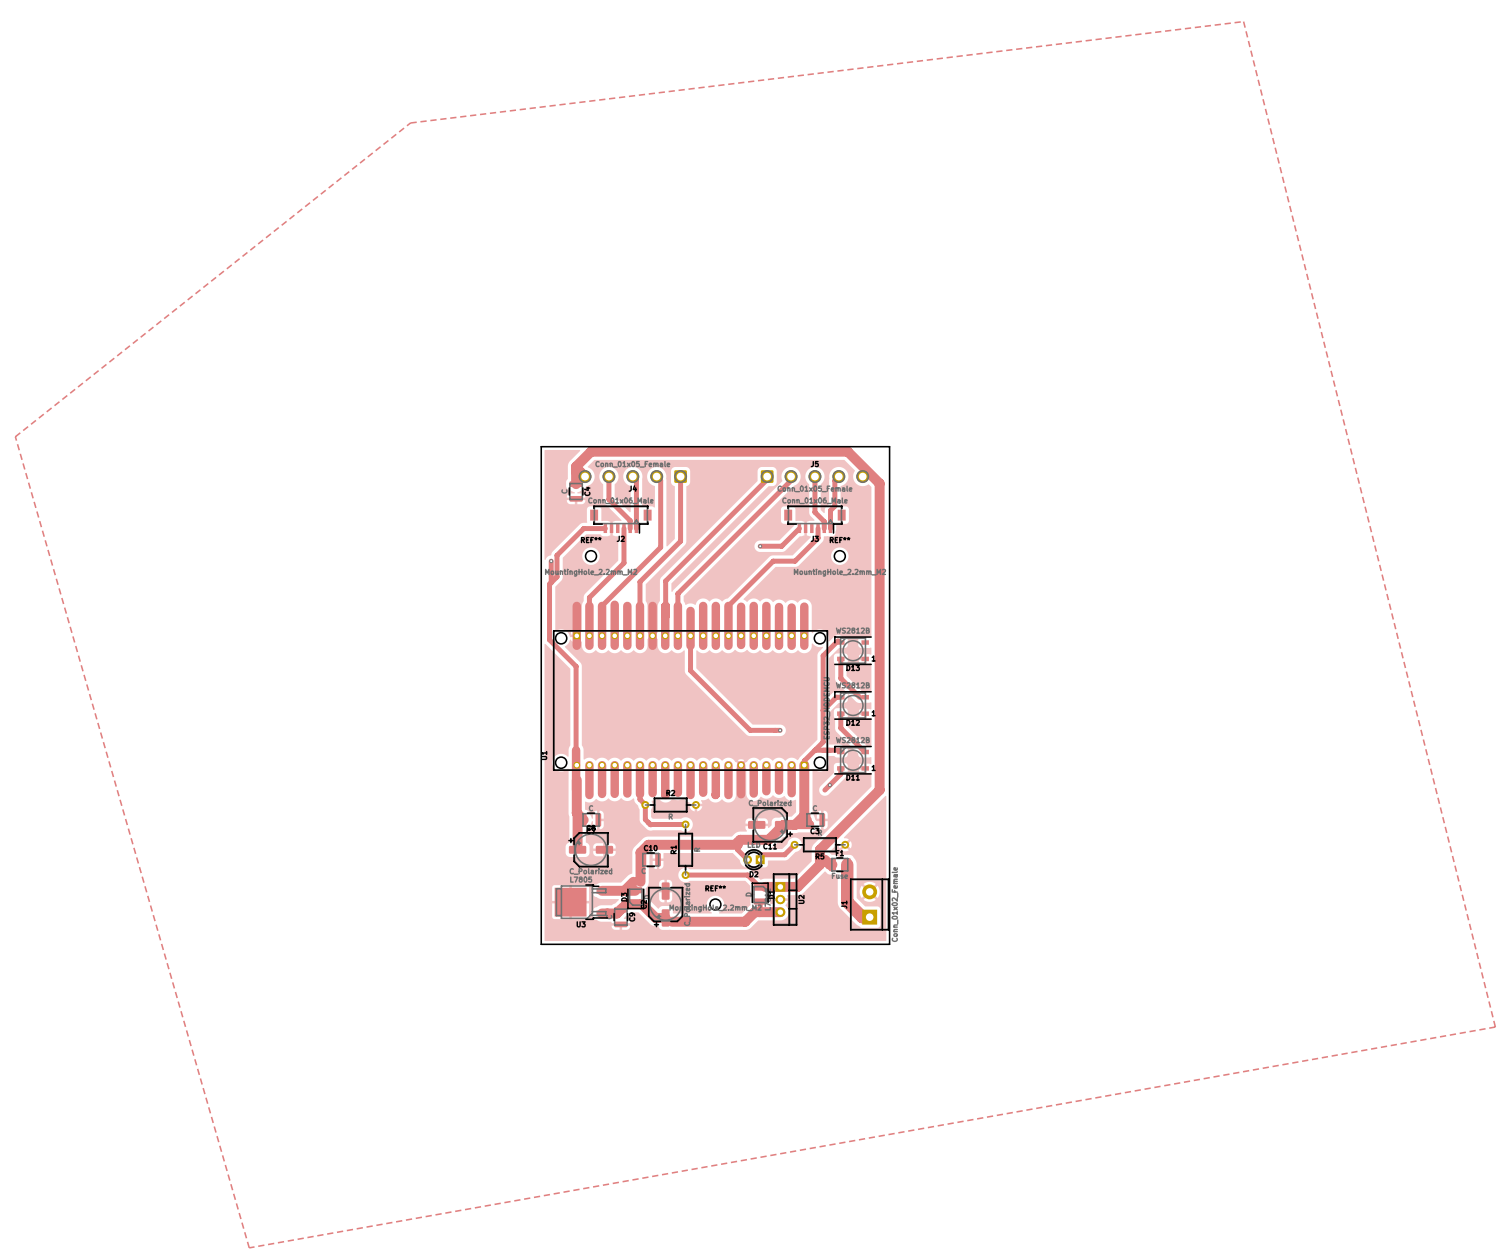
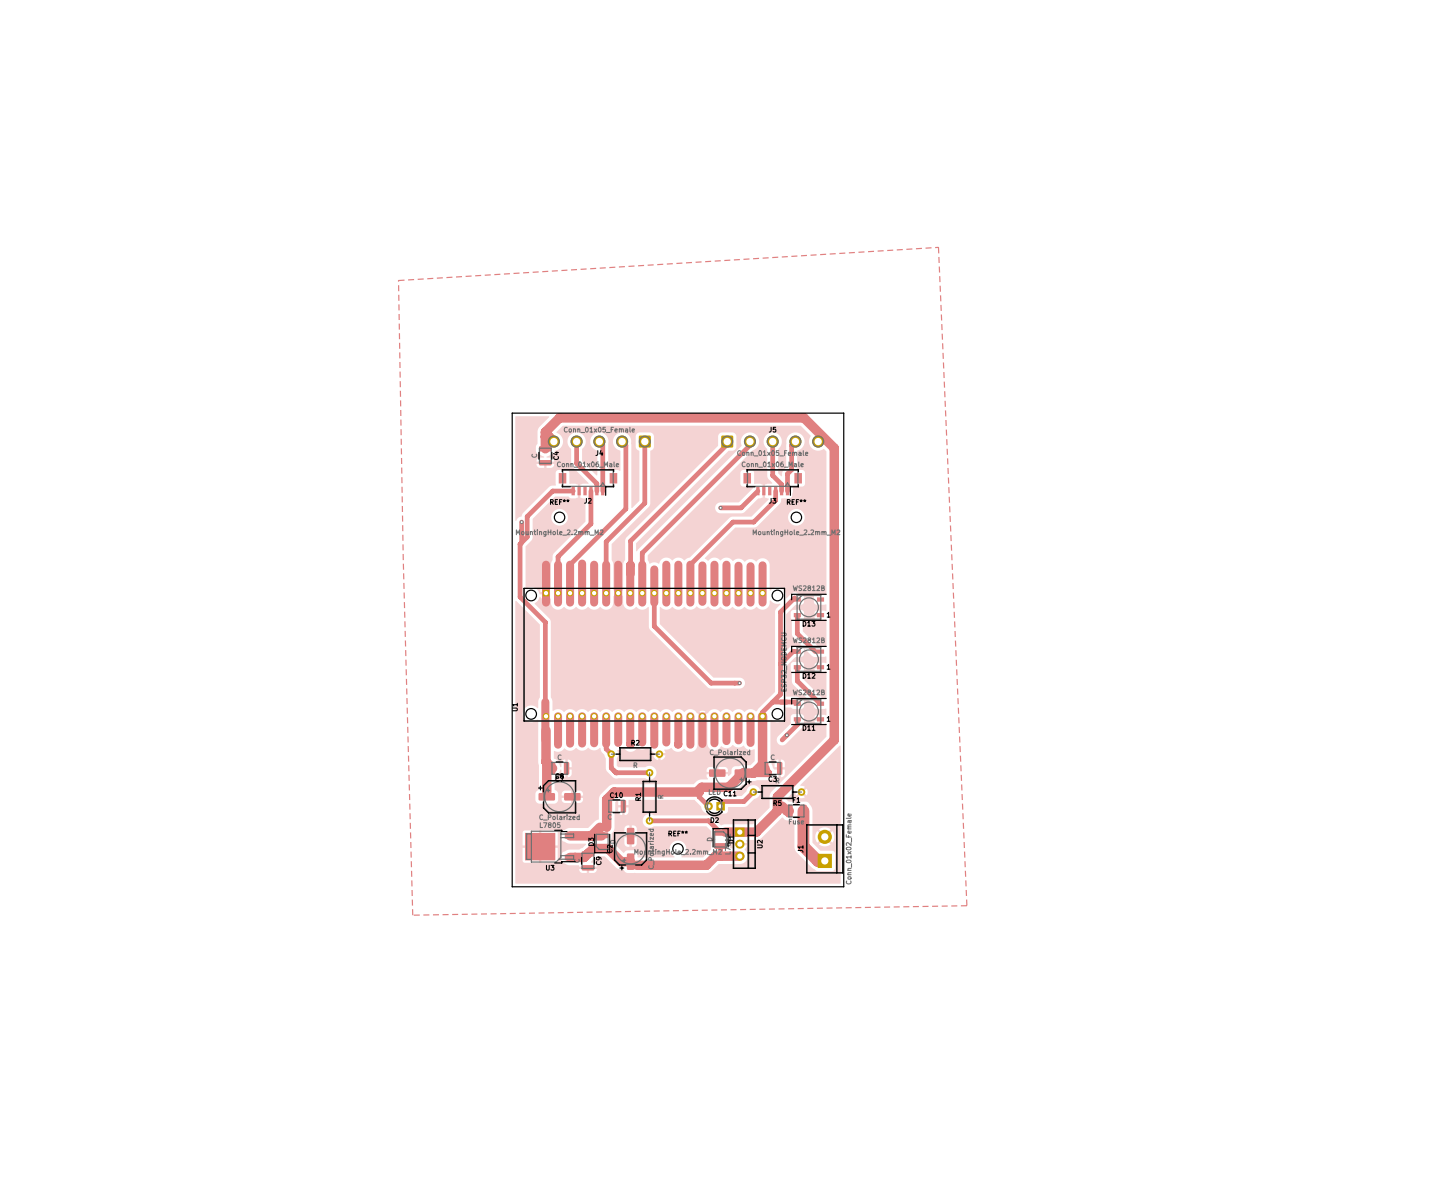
zone outline: (1243, 21) (410, 122) (15, 436) (249, 1247) (1495, 1027) (1243, 21) -> none
zone outline: none -> (938, 247) (398, 280) (403, 559) (412, 915) (966, 905) (938, 247)

